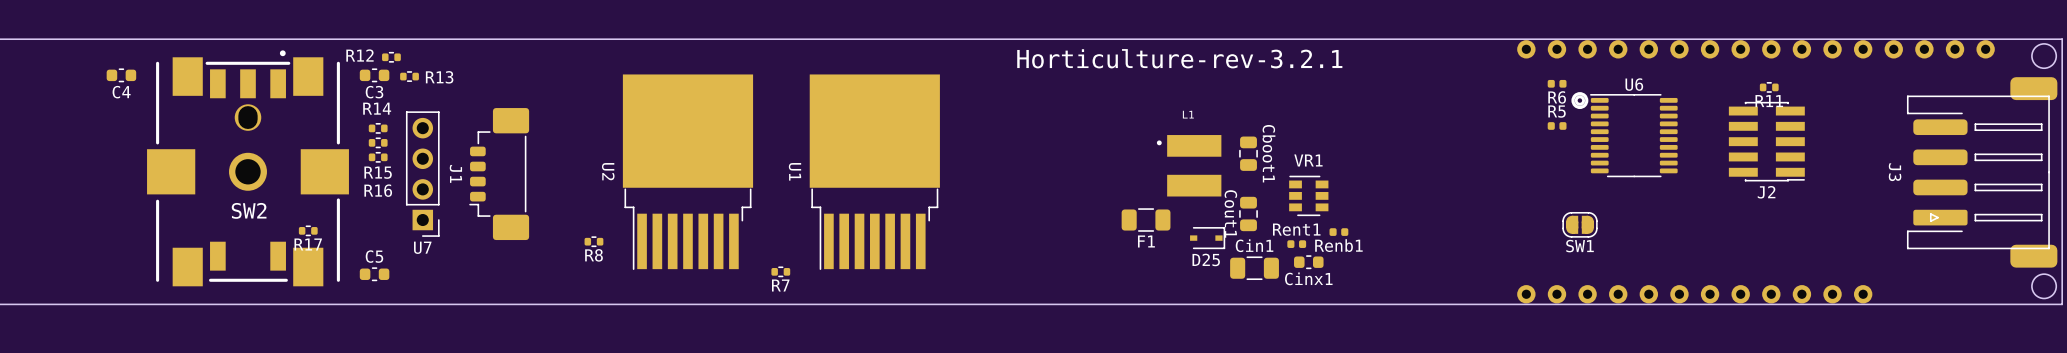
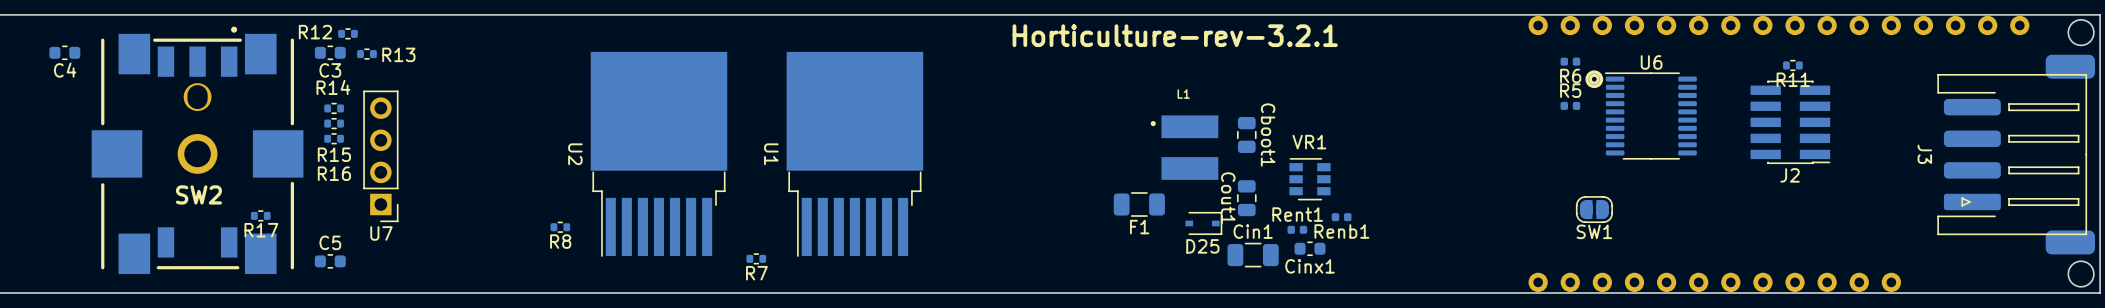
J1: (499, 174) -> none

